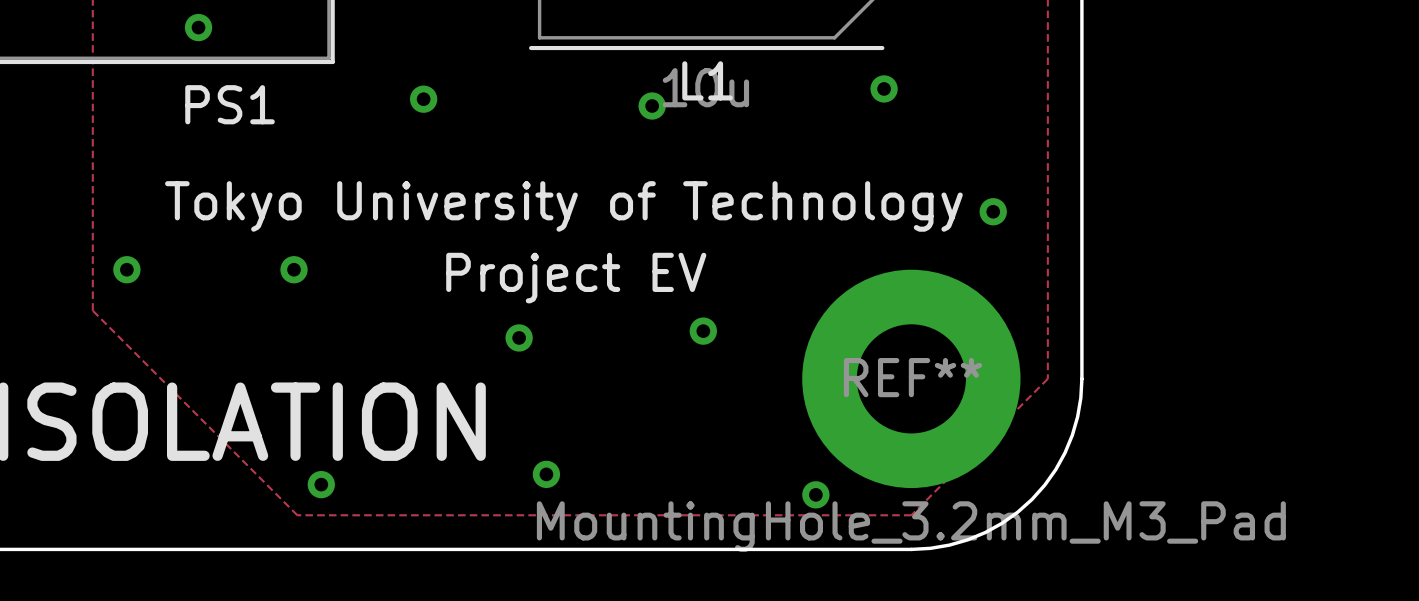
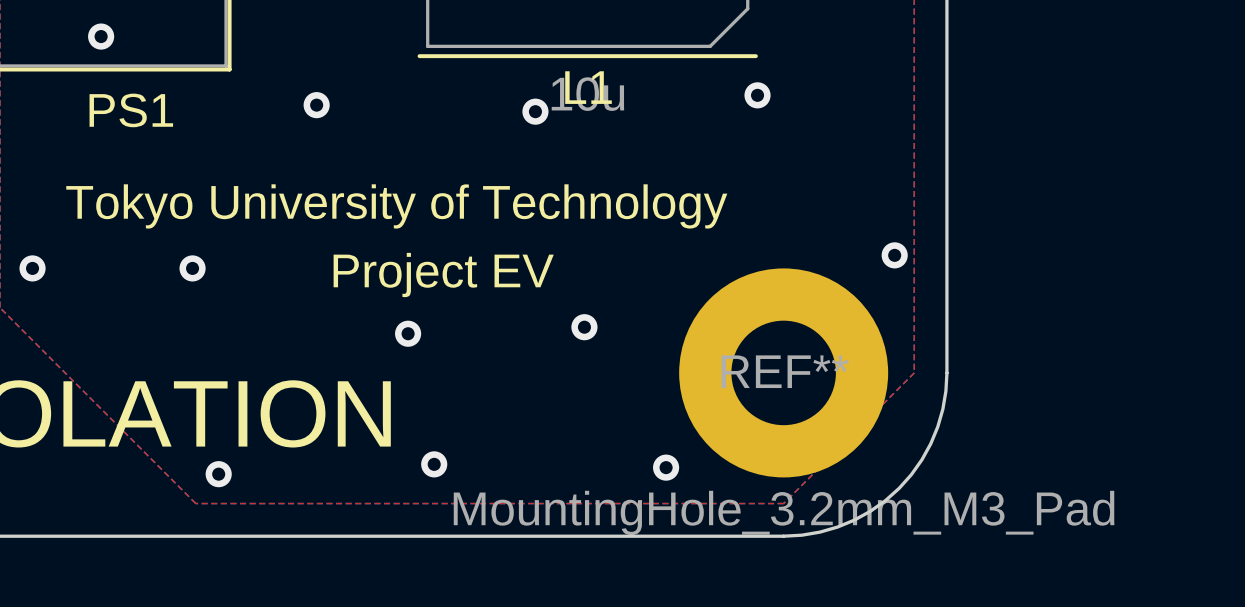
via position: (993, 211) -> (894, 255)
via position: (815, 494) -> (666, 467)

